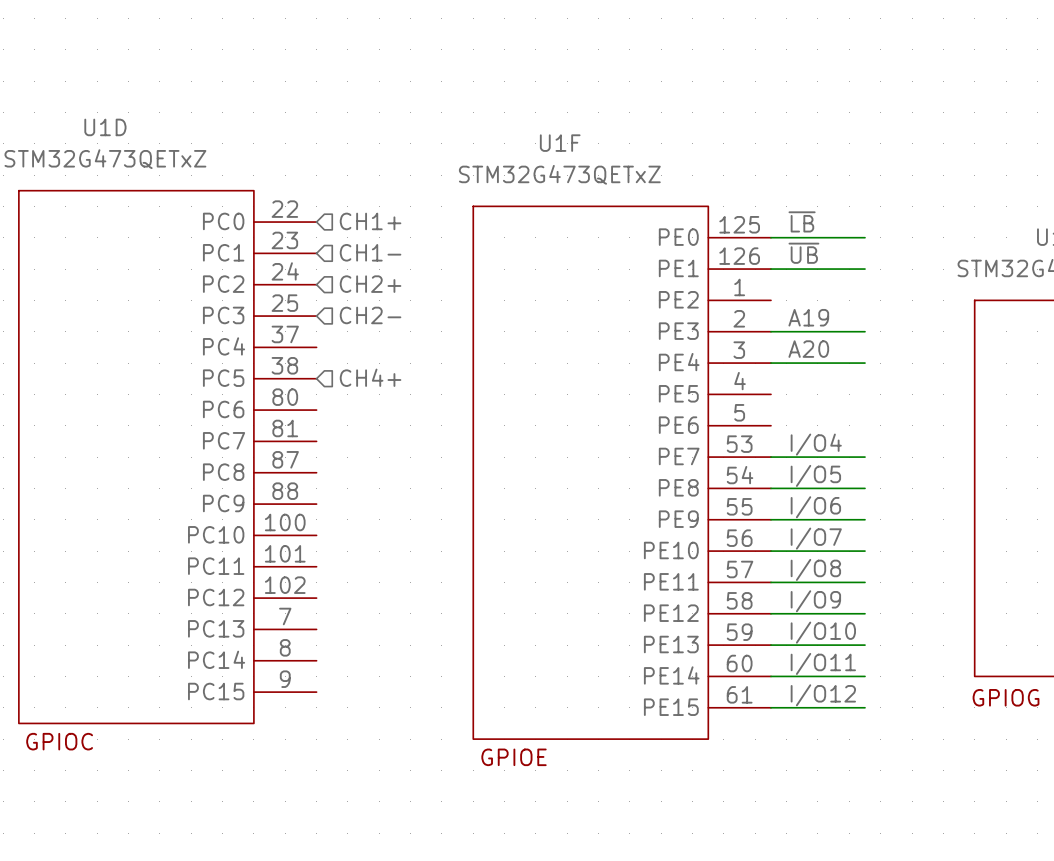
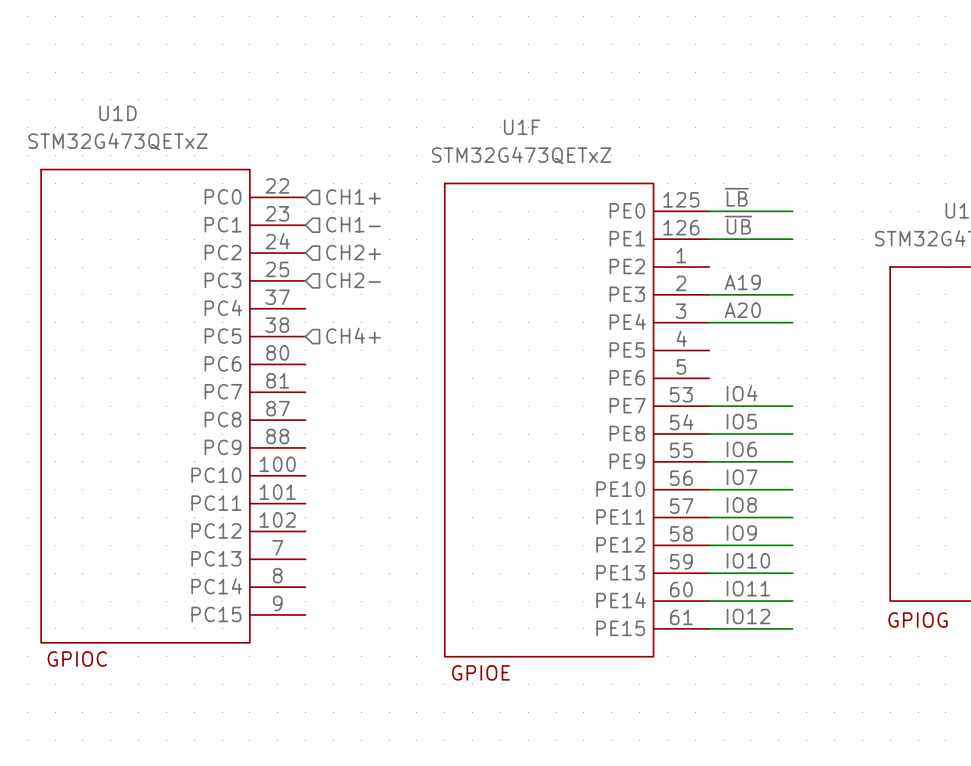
label: I/O4 (816, 444) -> IO4 (742, 393)
label: I/O5 (815, 475) -> IO5 (741, 421)
label: I/O6 (815, 507) -> IO6 (741, 449)
label: I/O7 (816, 538) -> IO7 (742, 477)
label: I/O8 (815, 569) -> IO8 (741, 505)
label: I/O9 (815, 601) -> IO9 (741, 532)
label: I/O10 (823, 632) -> IO10 (748, 560)
label: I/O11 (823, 663) -> IO11 (748, 588)
label: I/O12 (823, 695) -> IO12 (748, 616)

